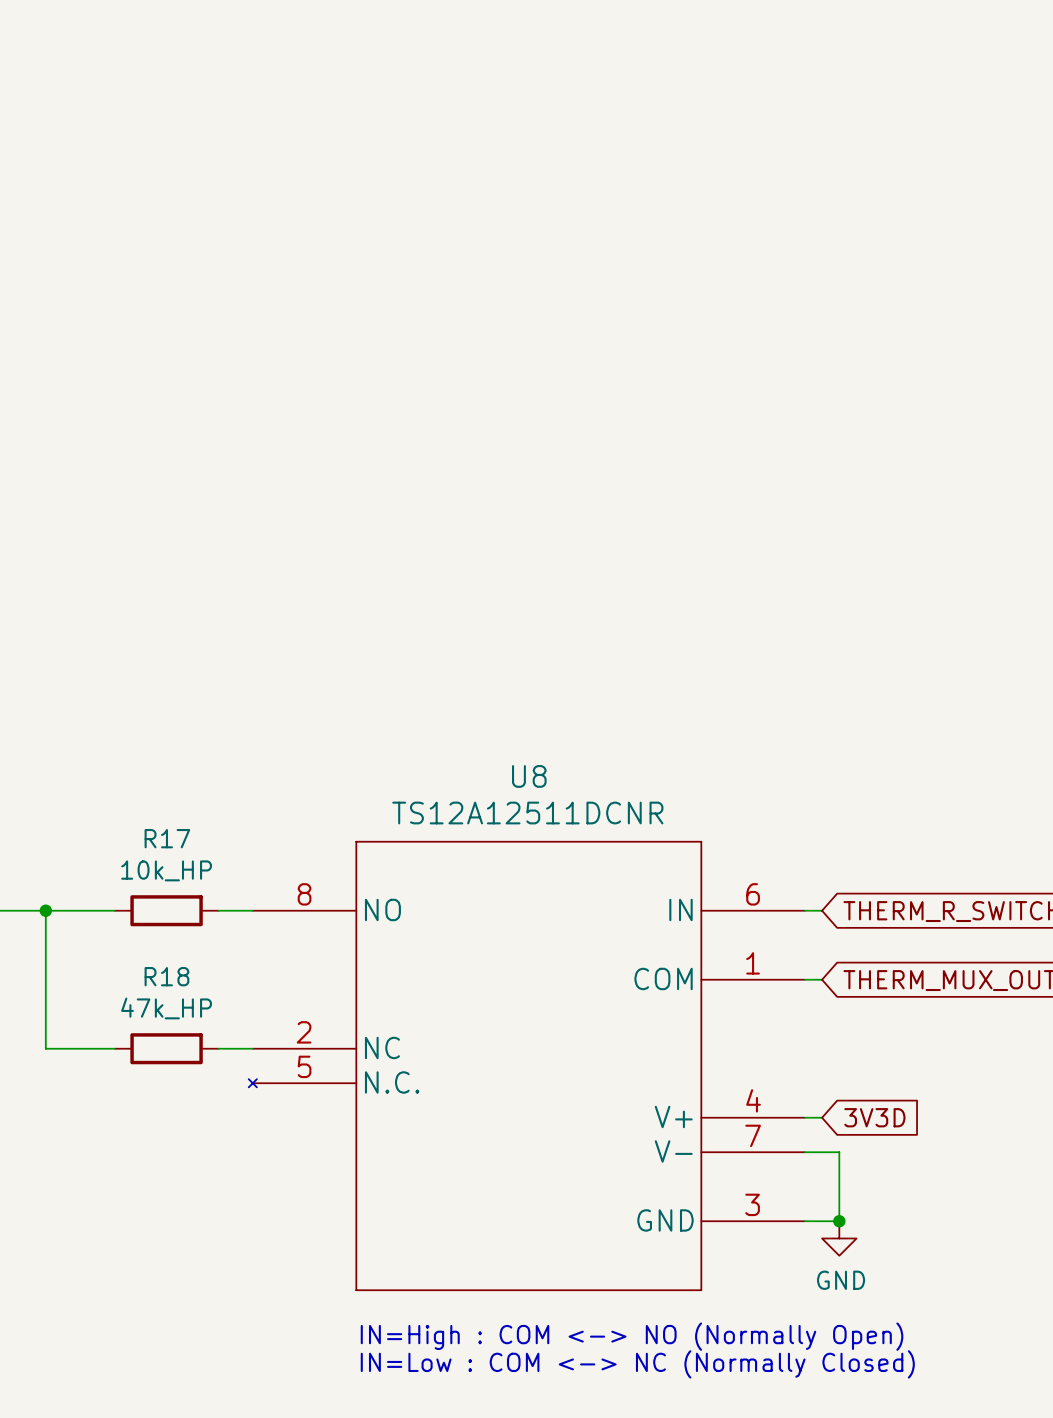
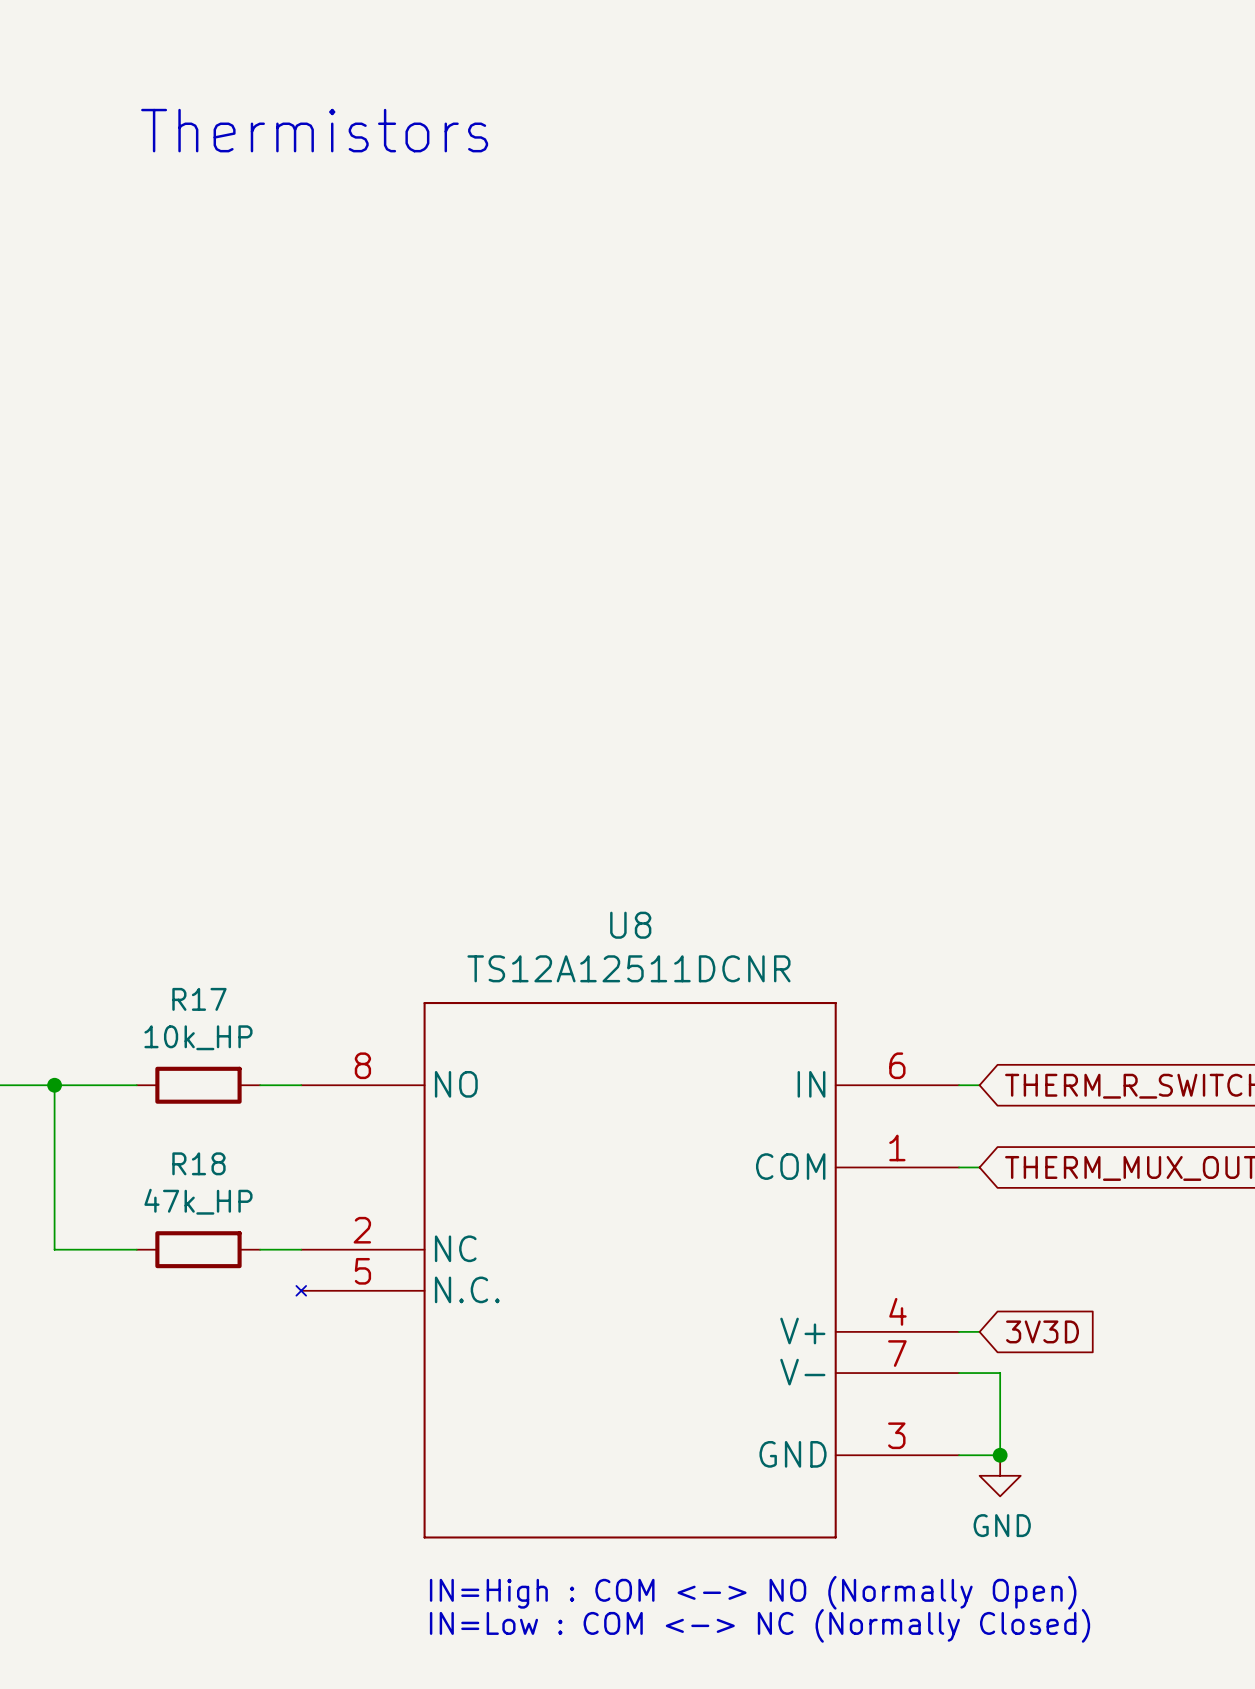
text: none -> Thermistors (314, 130)

